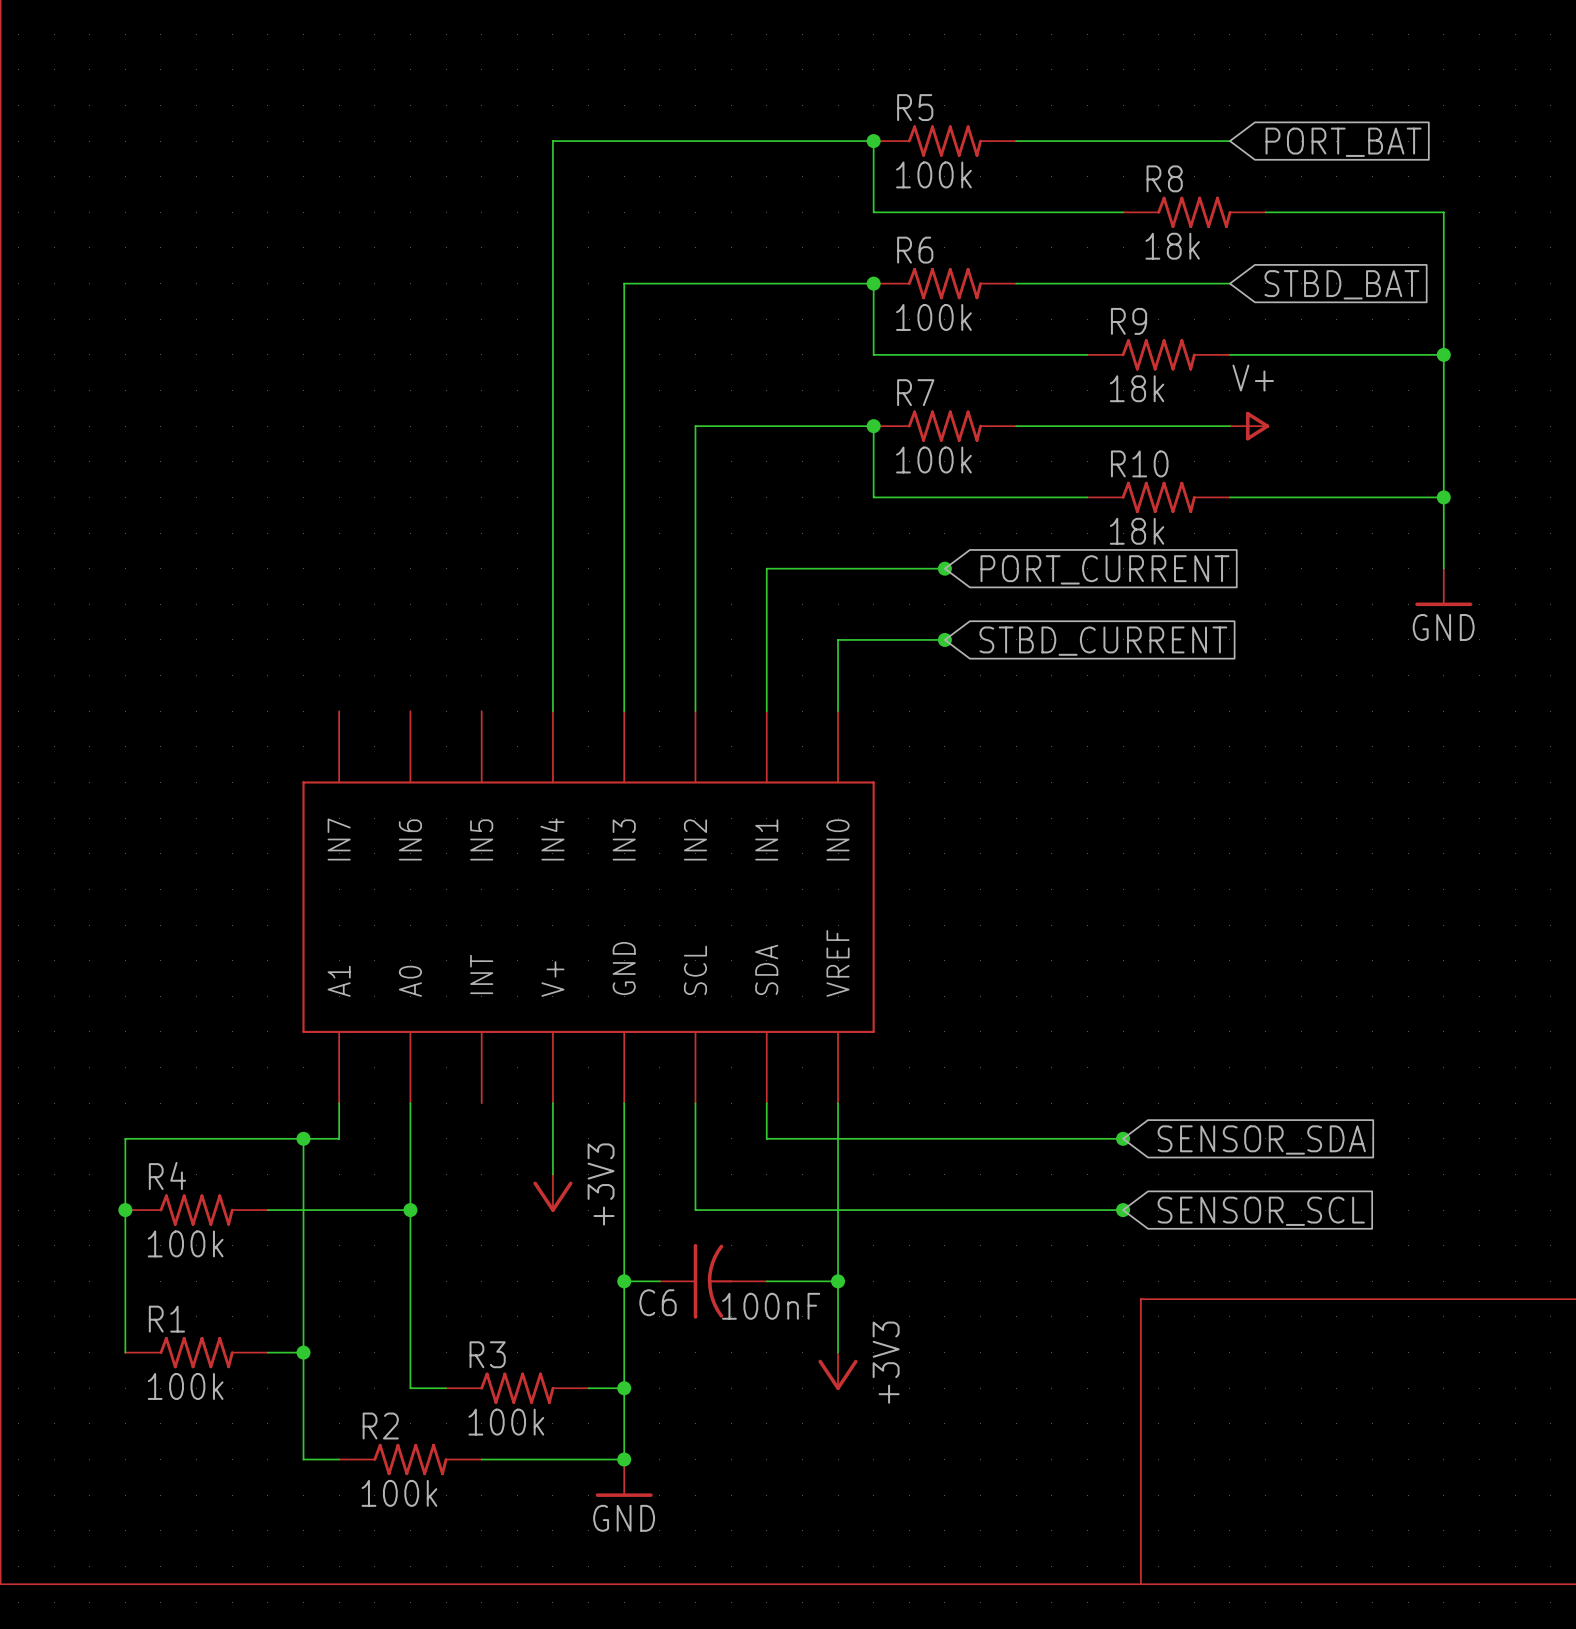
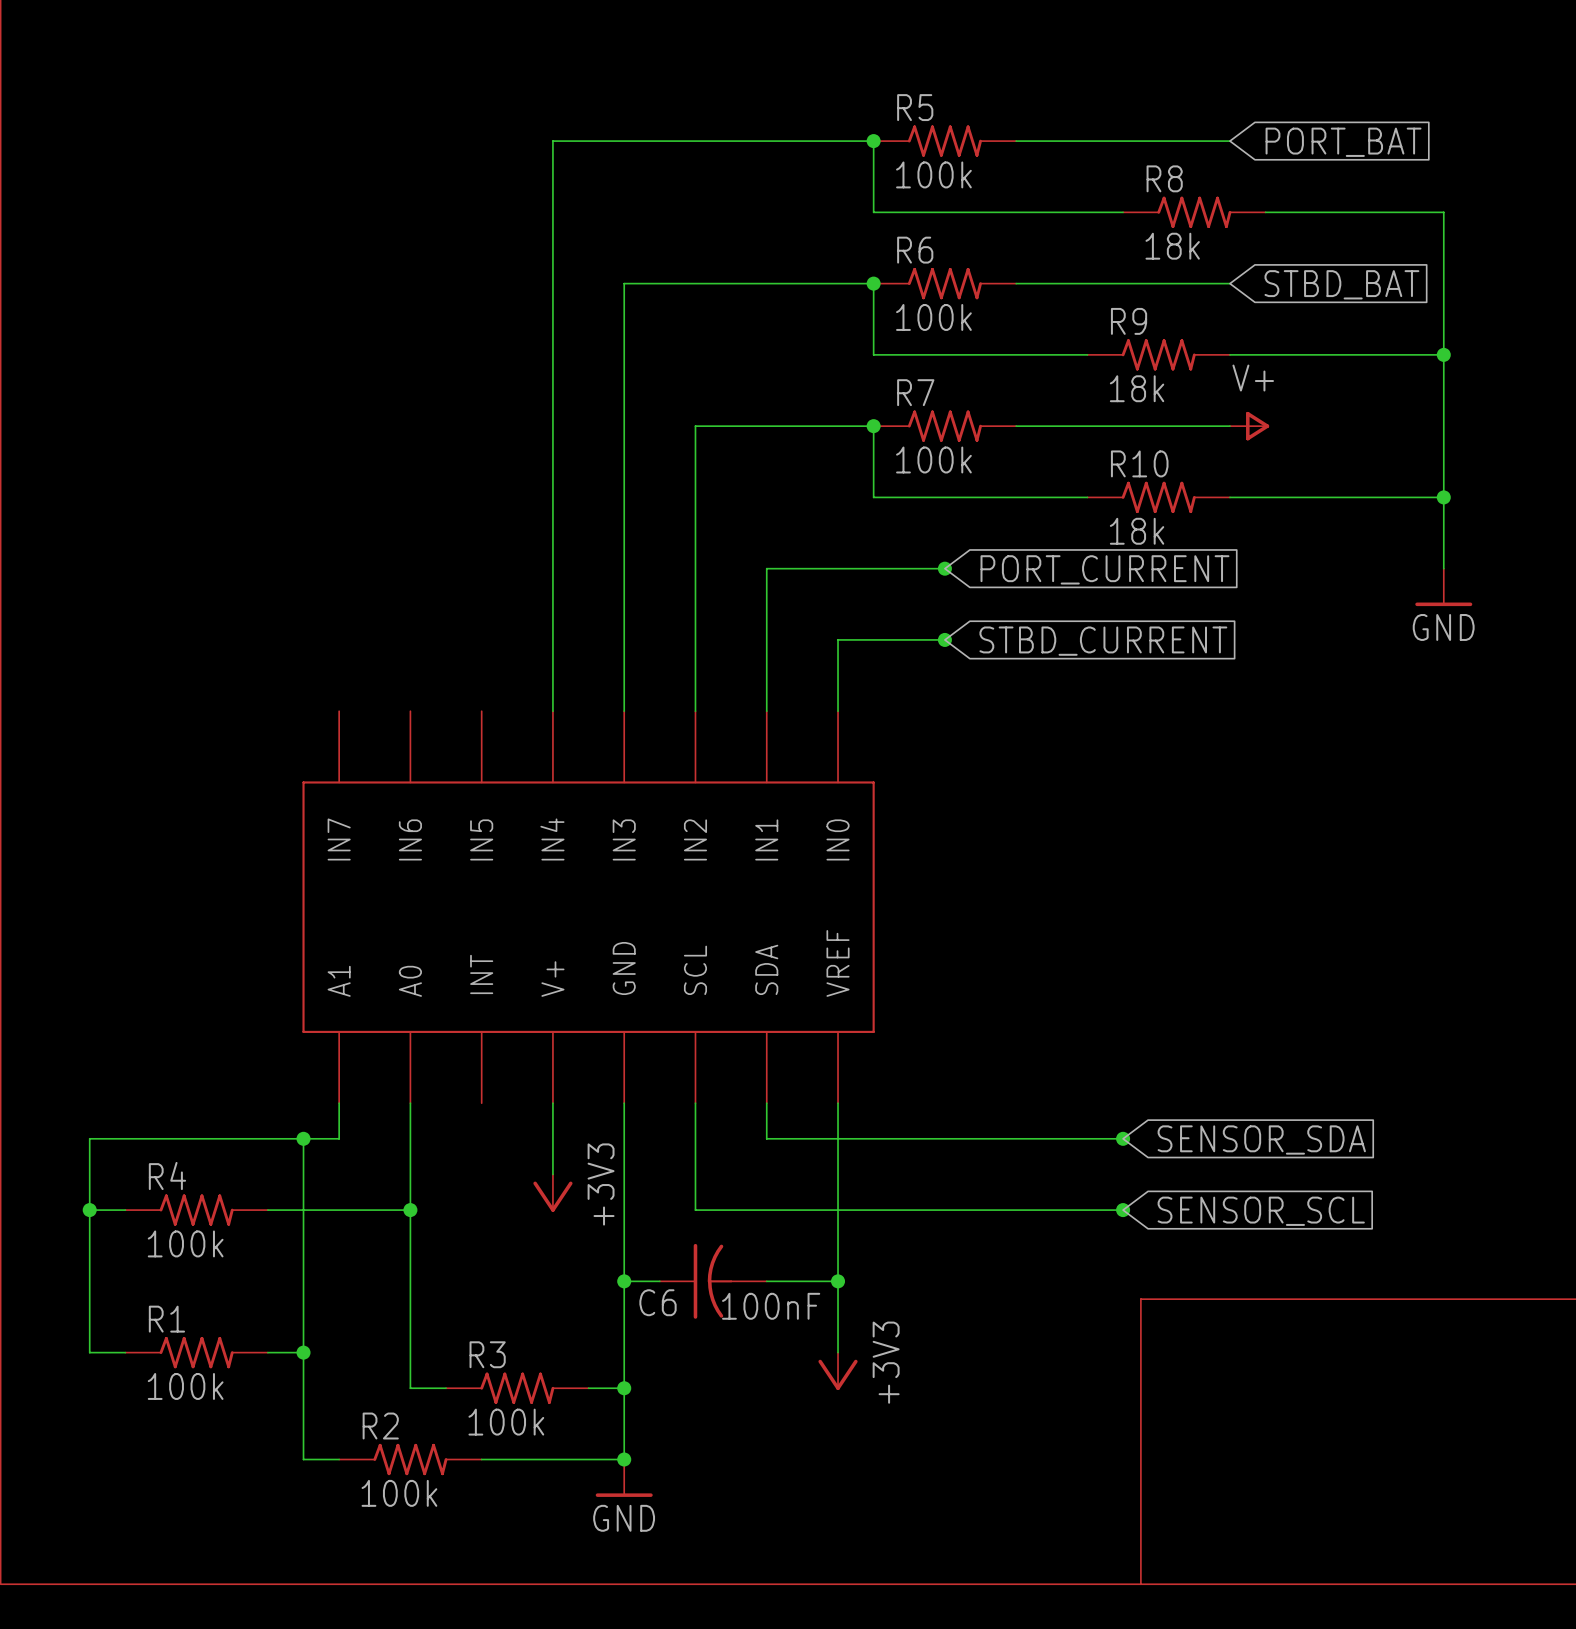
wire: (125, 1138) (125, 1352) -> (125, 1138) (89, 1138) (89, 1352) (125, 1352)
wire: none -> (89, 1210) (125, 1210)
junction position: (125, 1210) -> (89, 1210)

